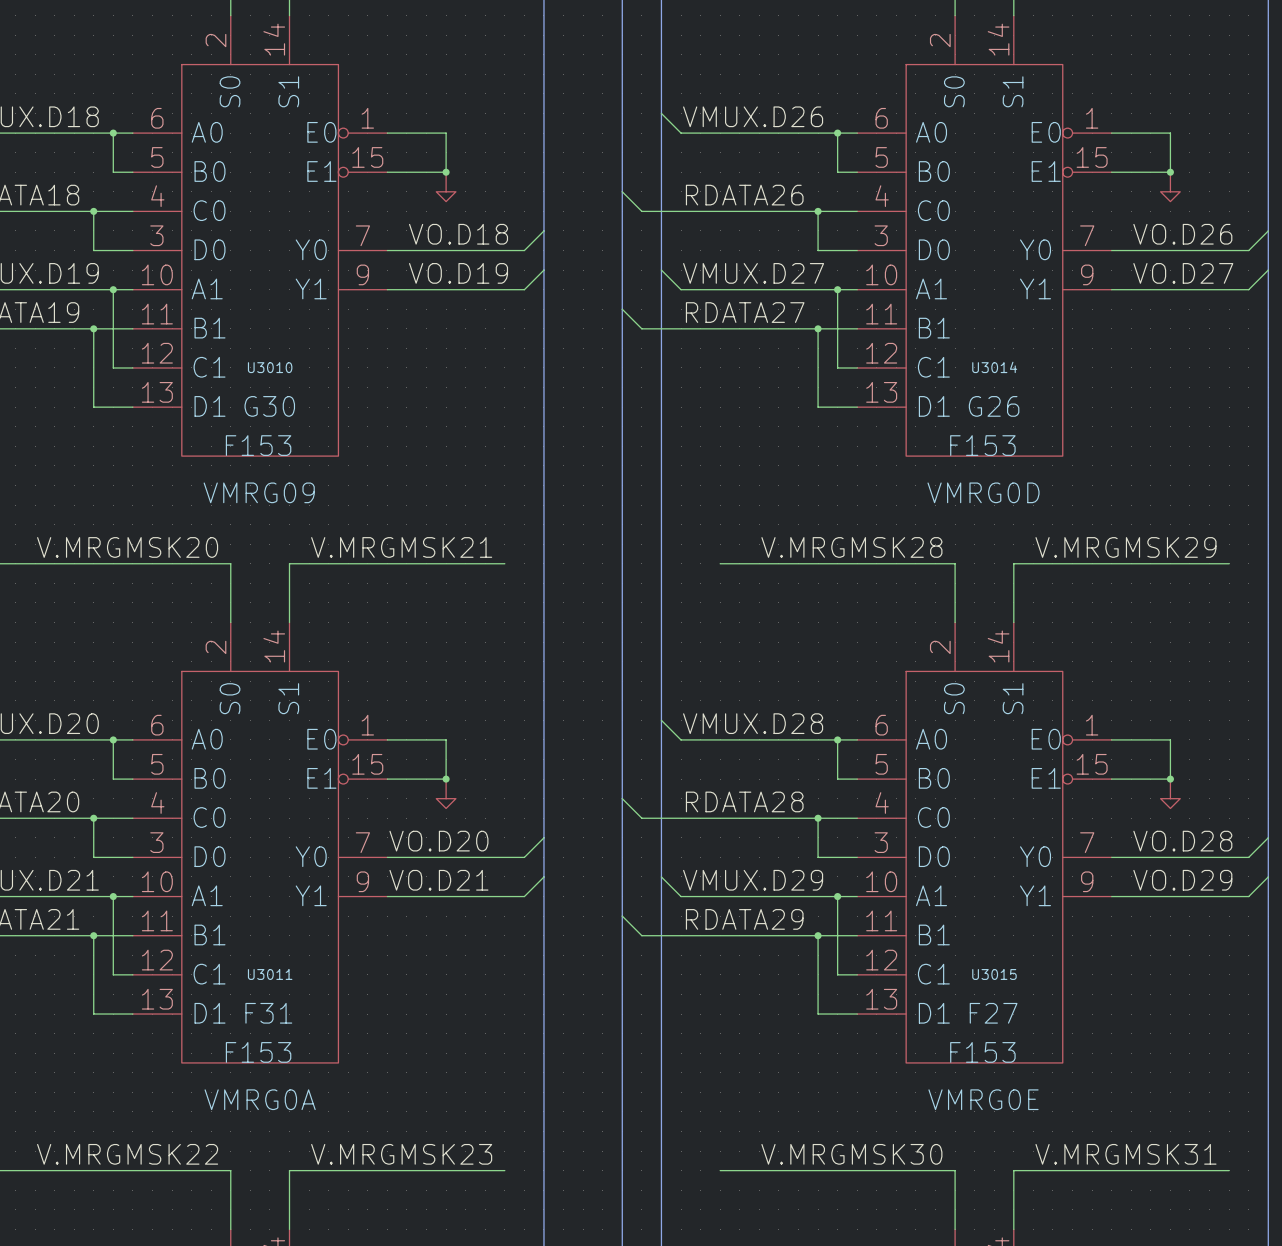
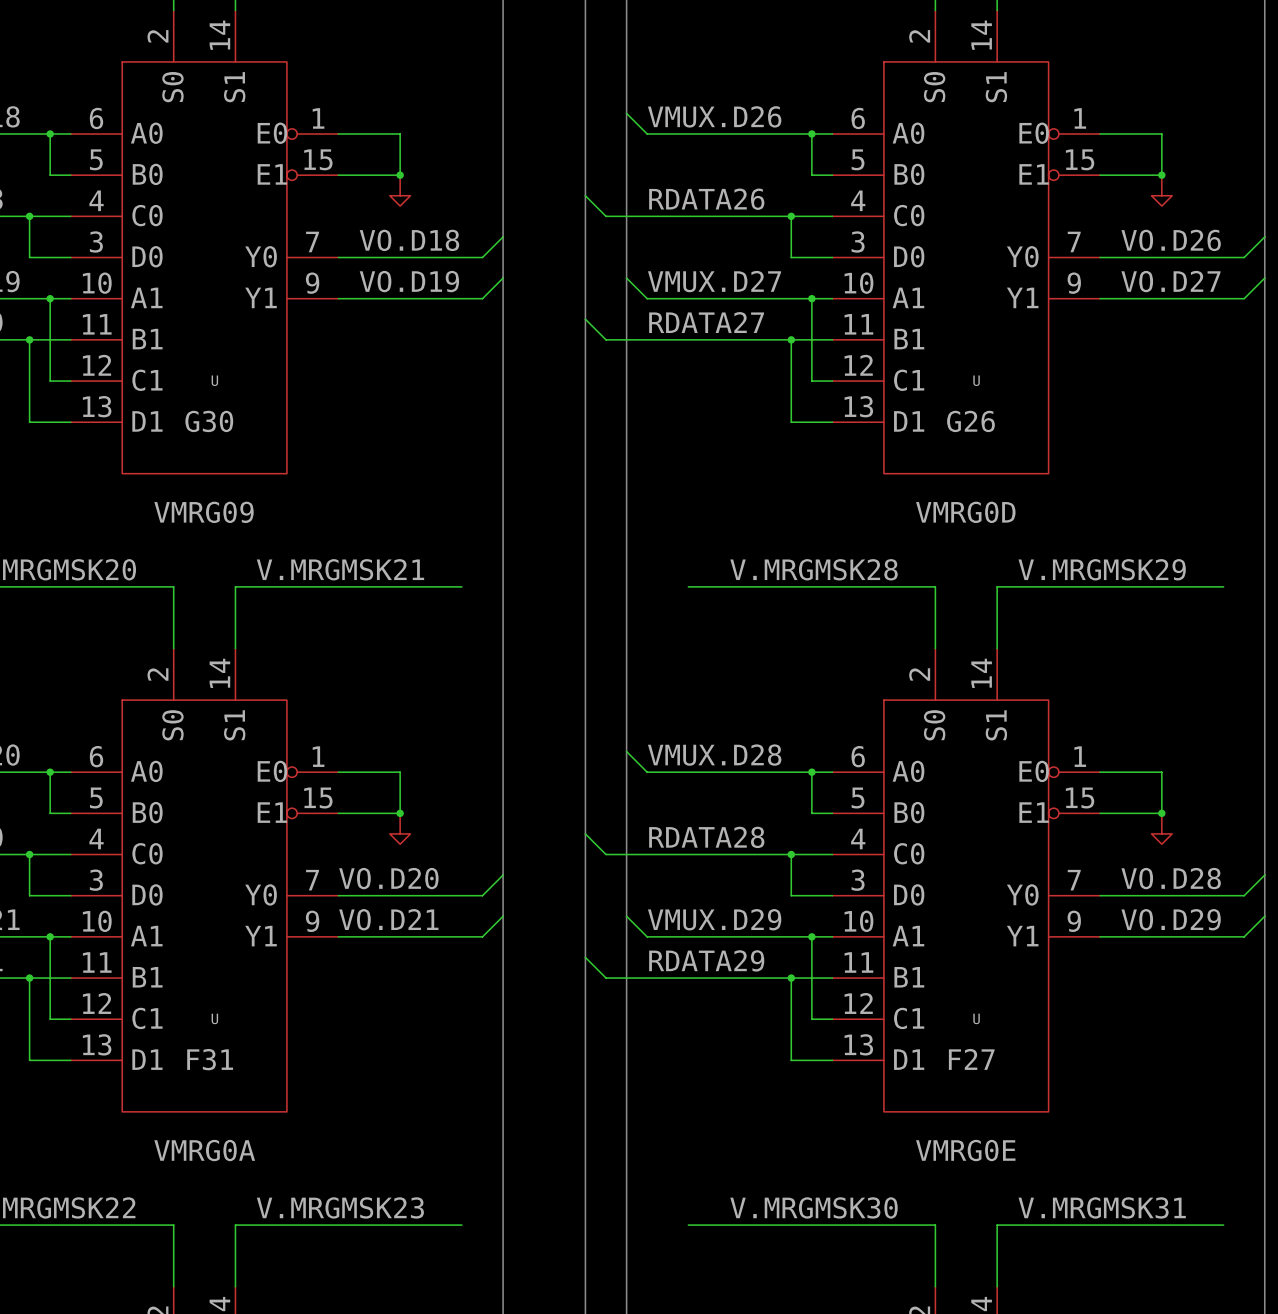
U3010 name: U3010 (270, 367) -> U (214, 380)
U3014 name: U3014 (994, 367) -> U (976, 380)
U3010 value: F153 (258, 445) -> none
U3014 value: F153 (982, 445) -> none
U3011 name: U3011 (270, 974) -> U (214, 1018)
U3015 name: U3015 (994, 974) -> U (976, 1018)
U3011 value: F153 (258, 1052) -> none
U3015 value: F153 (982, 1052) -> none

